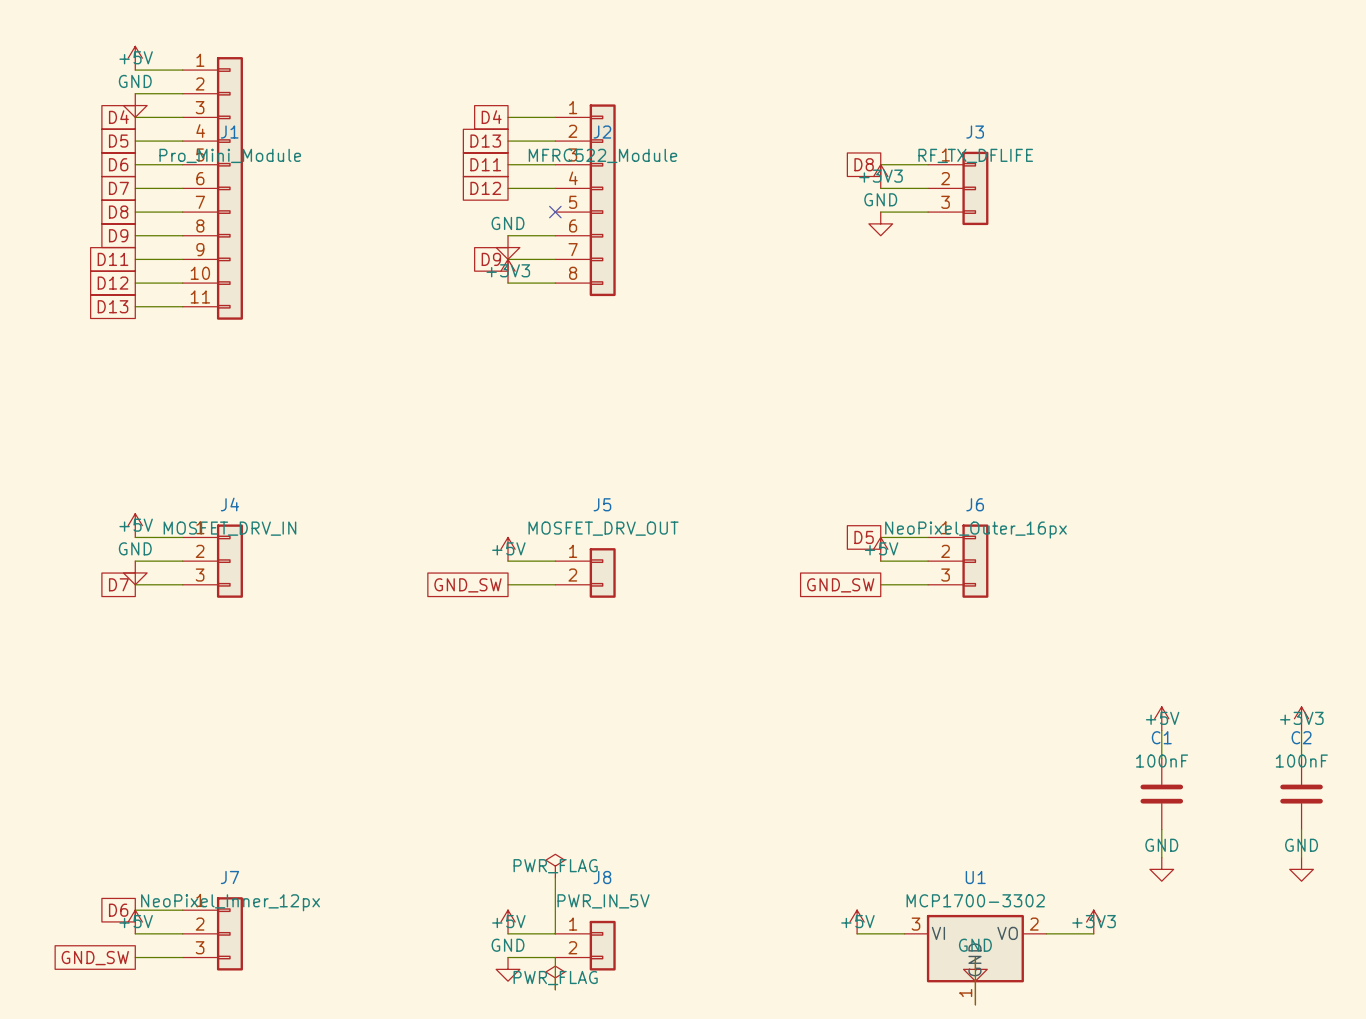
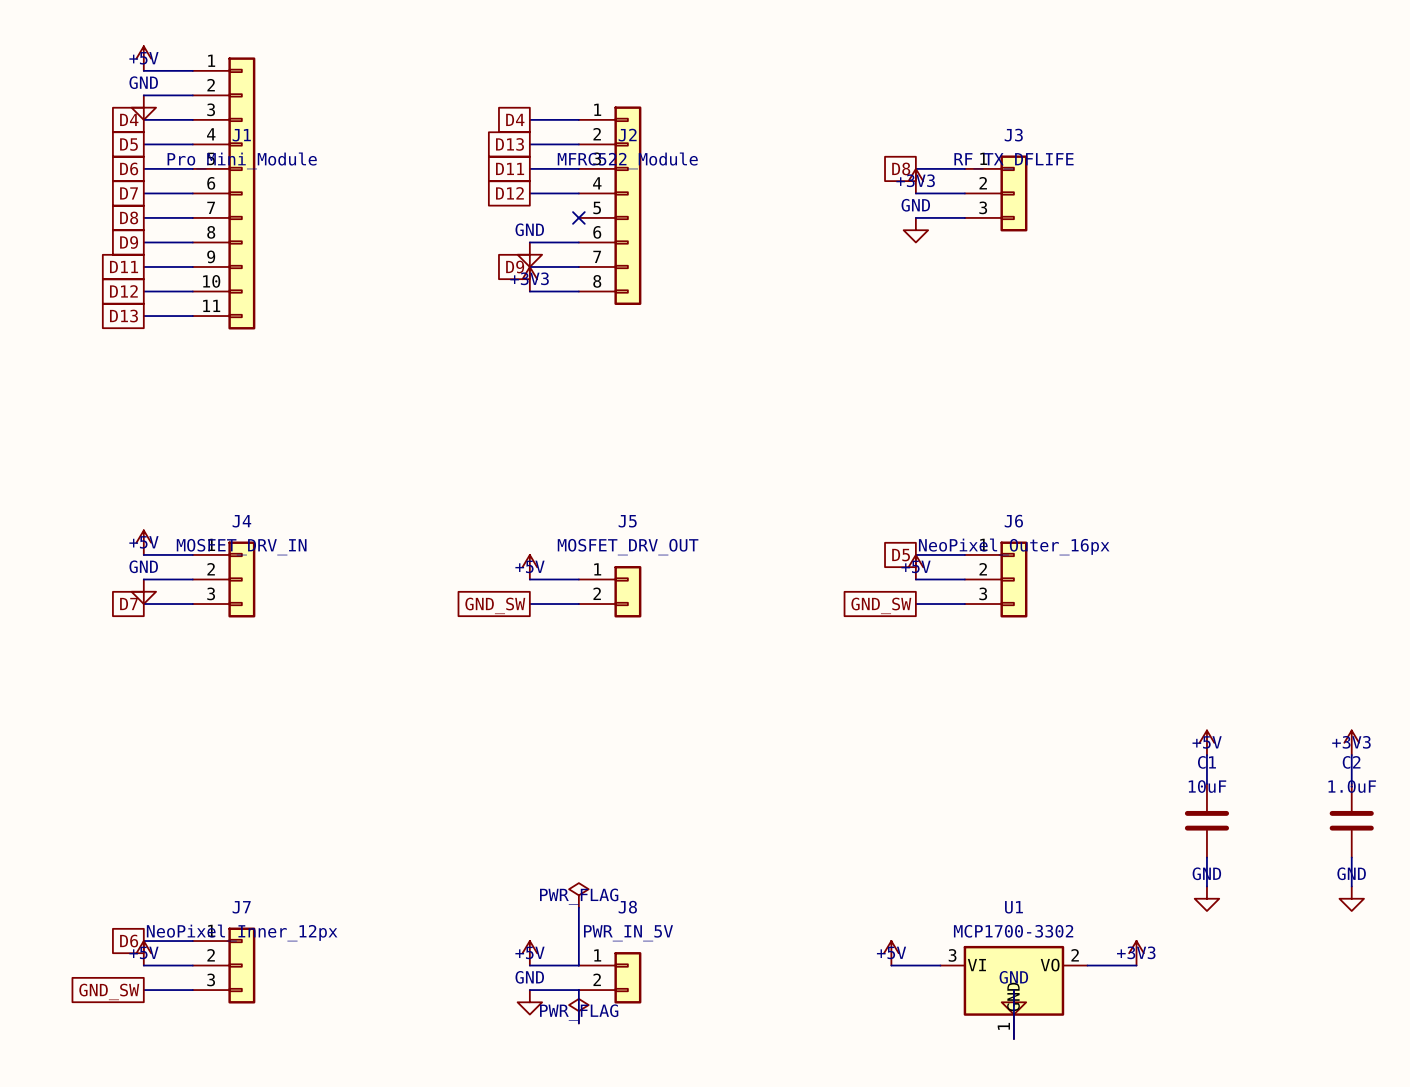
C1 value: 100nF (1162, 761) -> 10uF (1207, 786)
C2 value: 100nF (1301, 761) -> 1.0uF (1352, 786)

